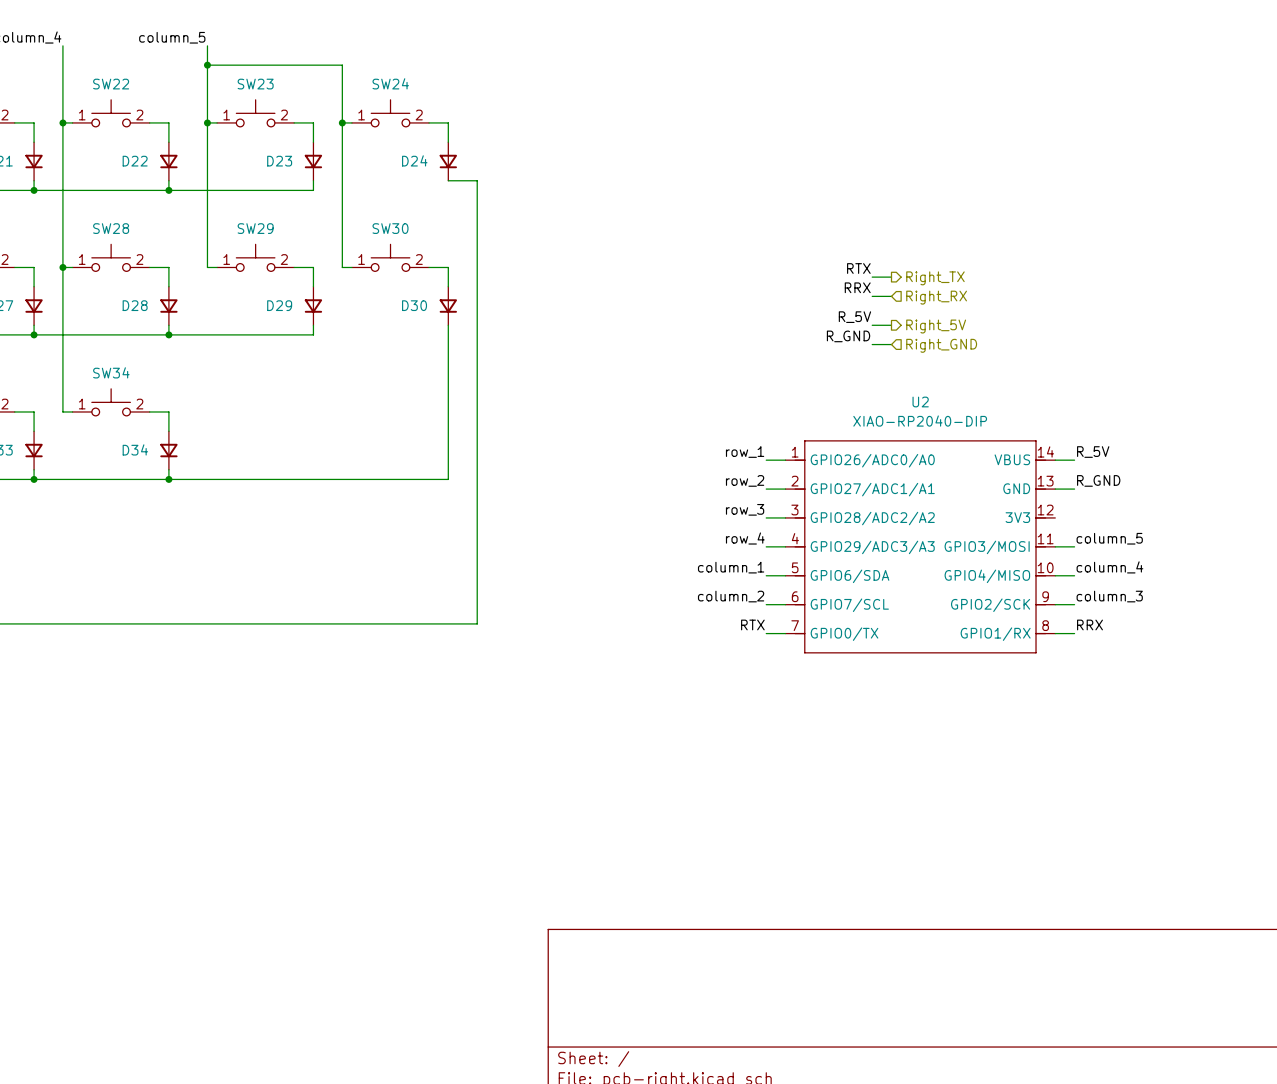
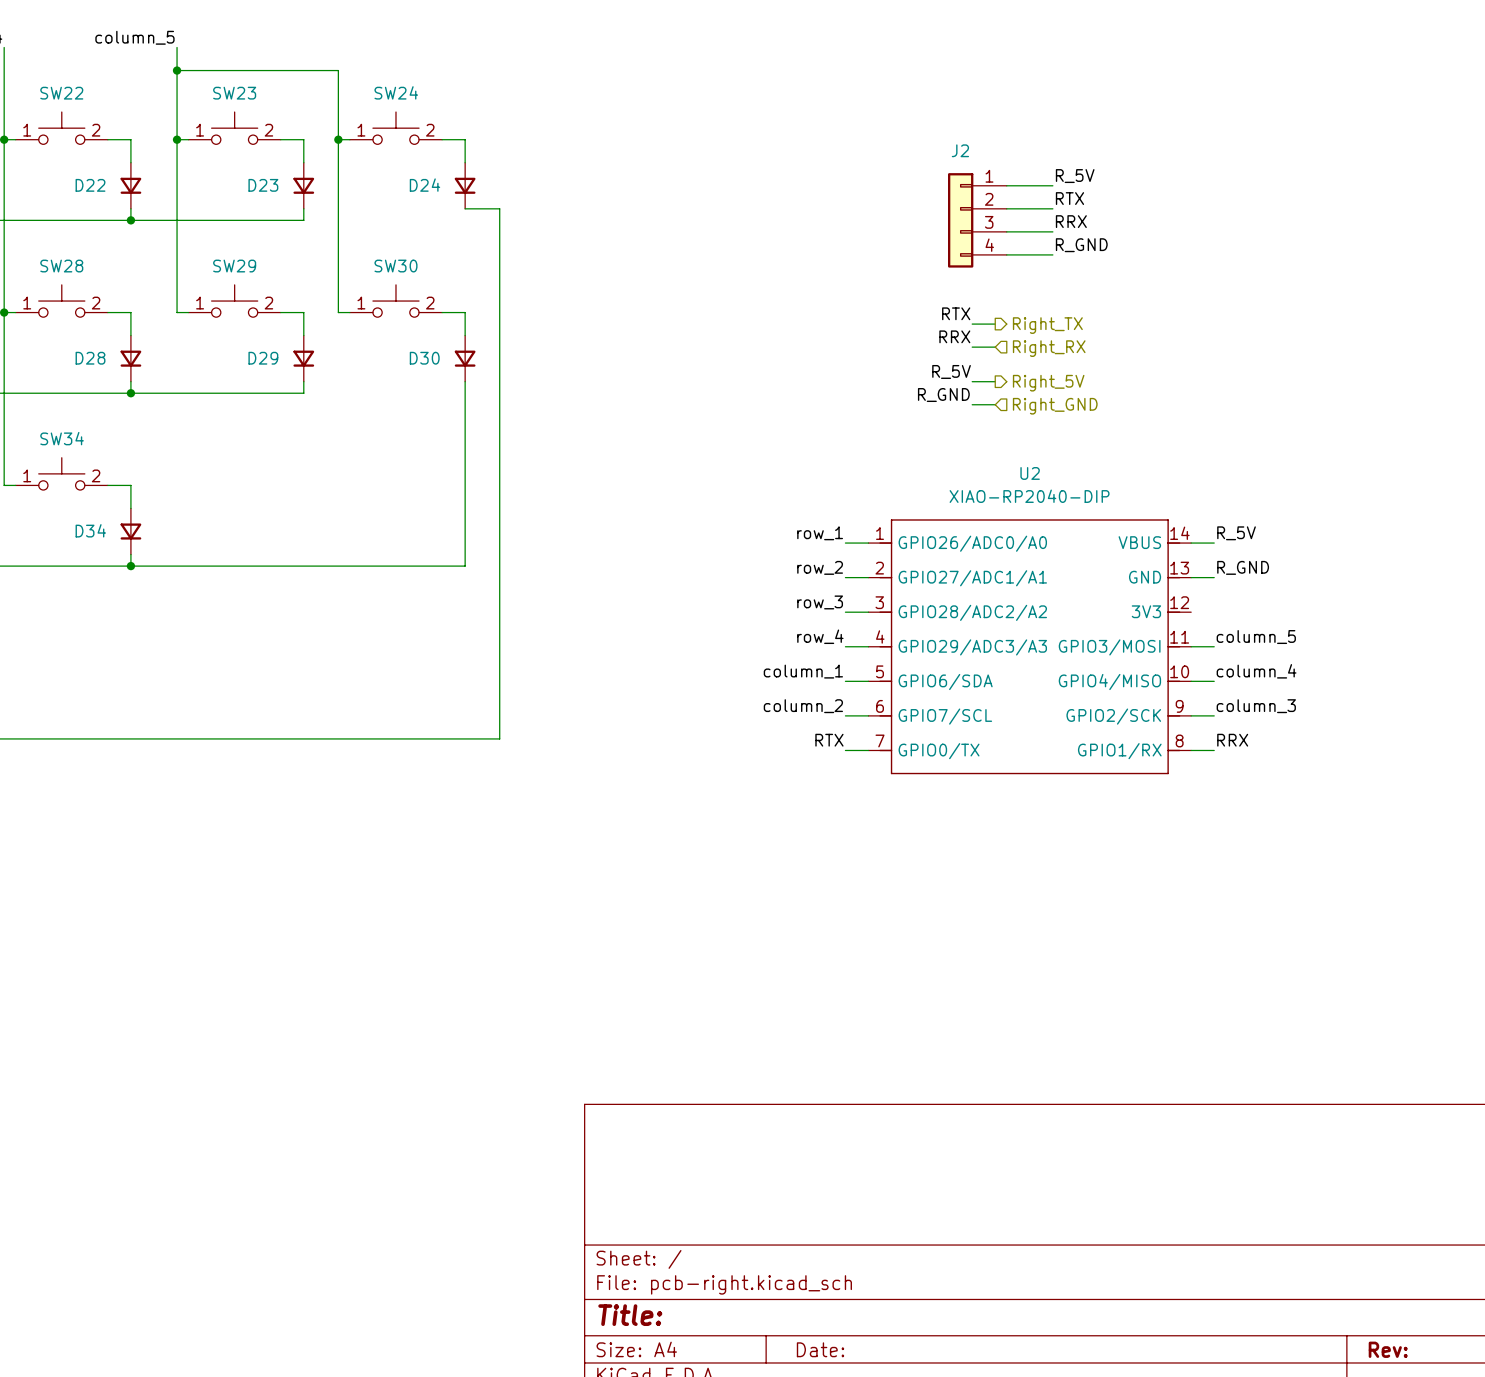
label: none -> R_5V (1075, 176)
wire: none -> (1006, 185) (1052, 185)
label: none -> RTX (1069, 198)
wire: none -> (1006, 208) (1052, 208)
J2: none -> (977, 220)
label: none -> RRX (1071, 221)
wire: none -> (1006, 231) (1052, 231)
label: none -> R_GND (1081, 245)
wire: none -> (1006, 254) (1052, 254)

